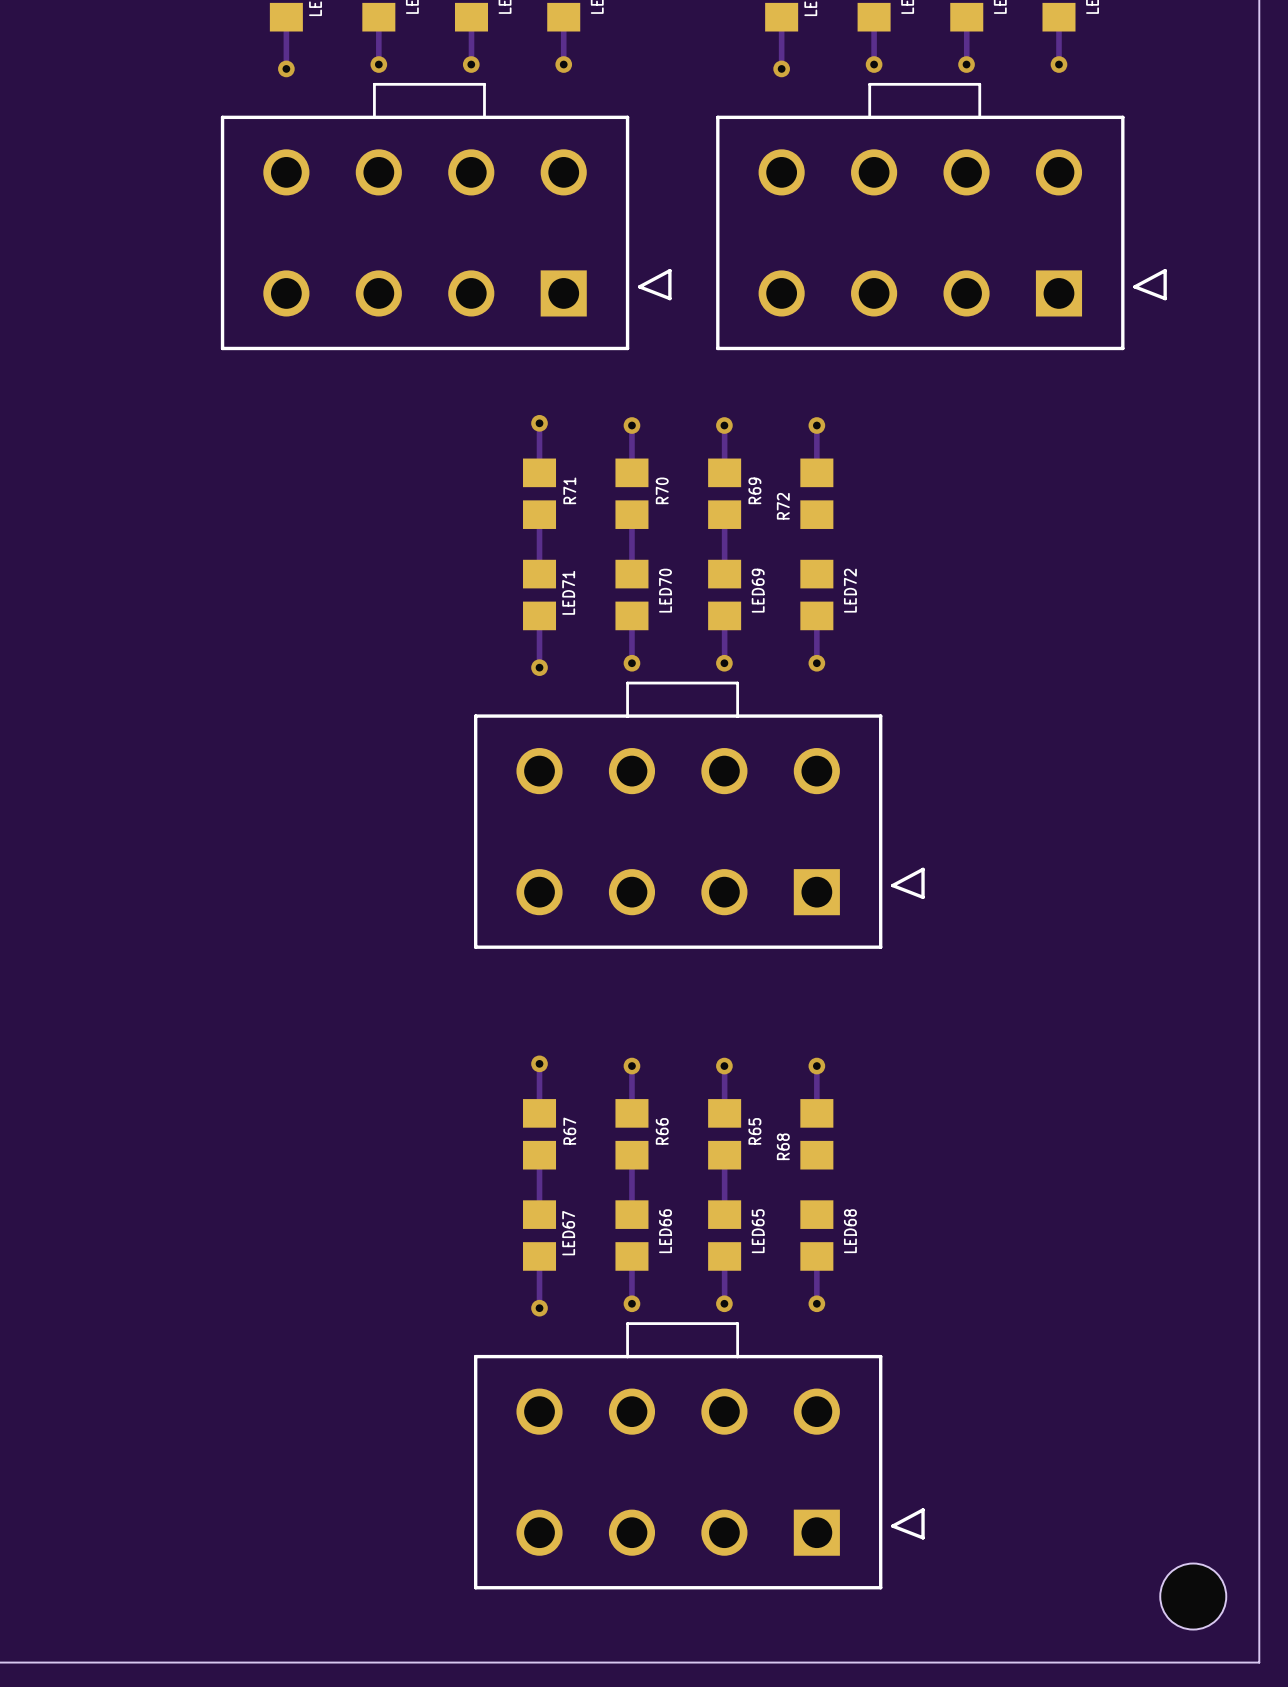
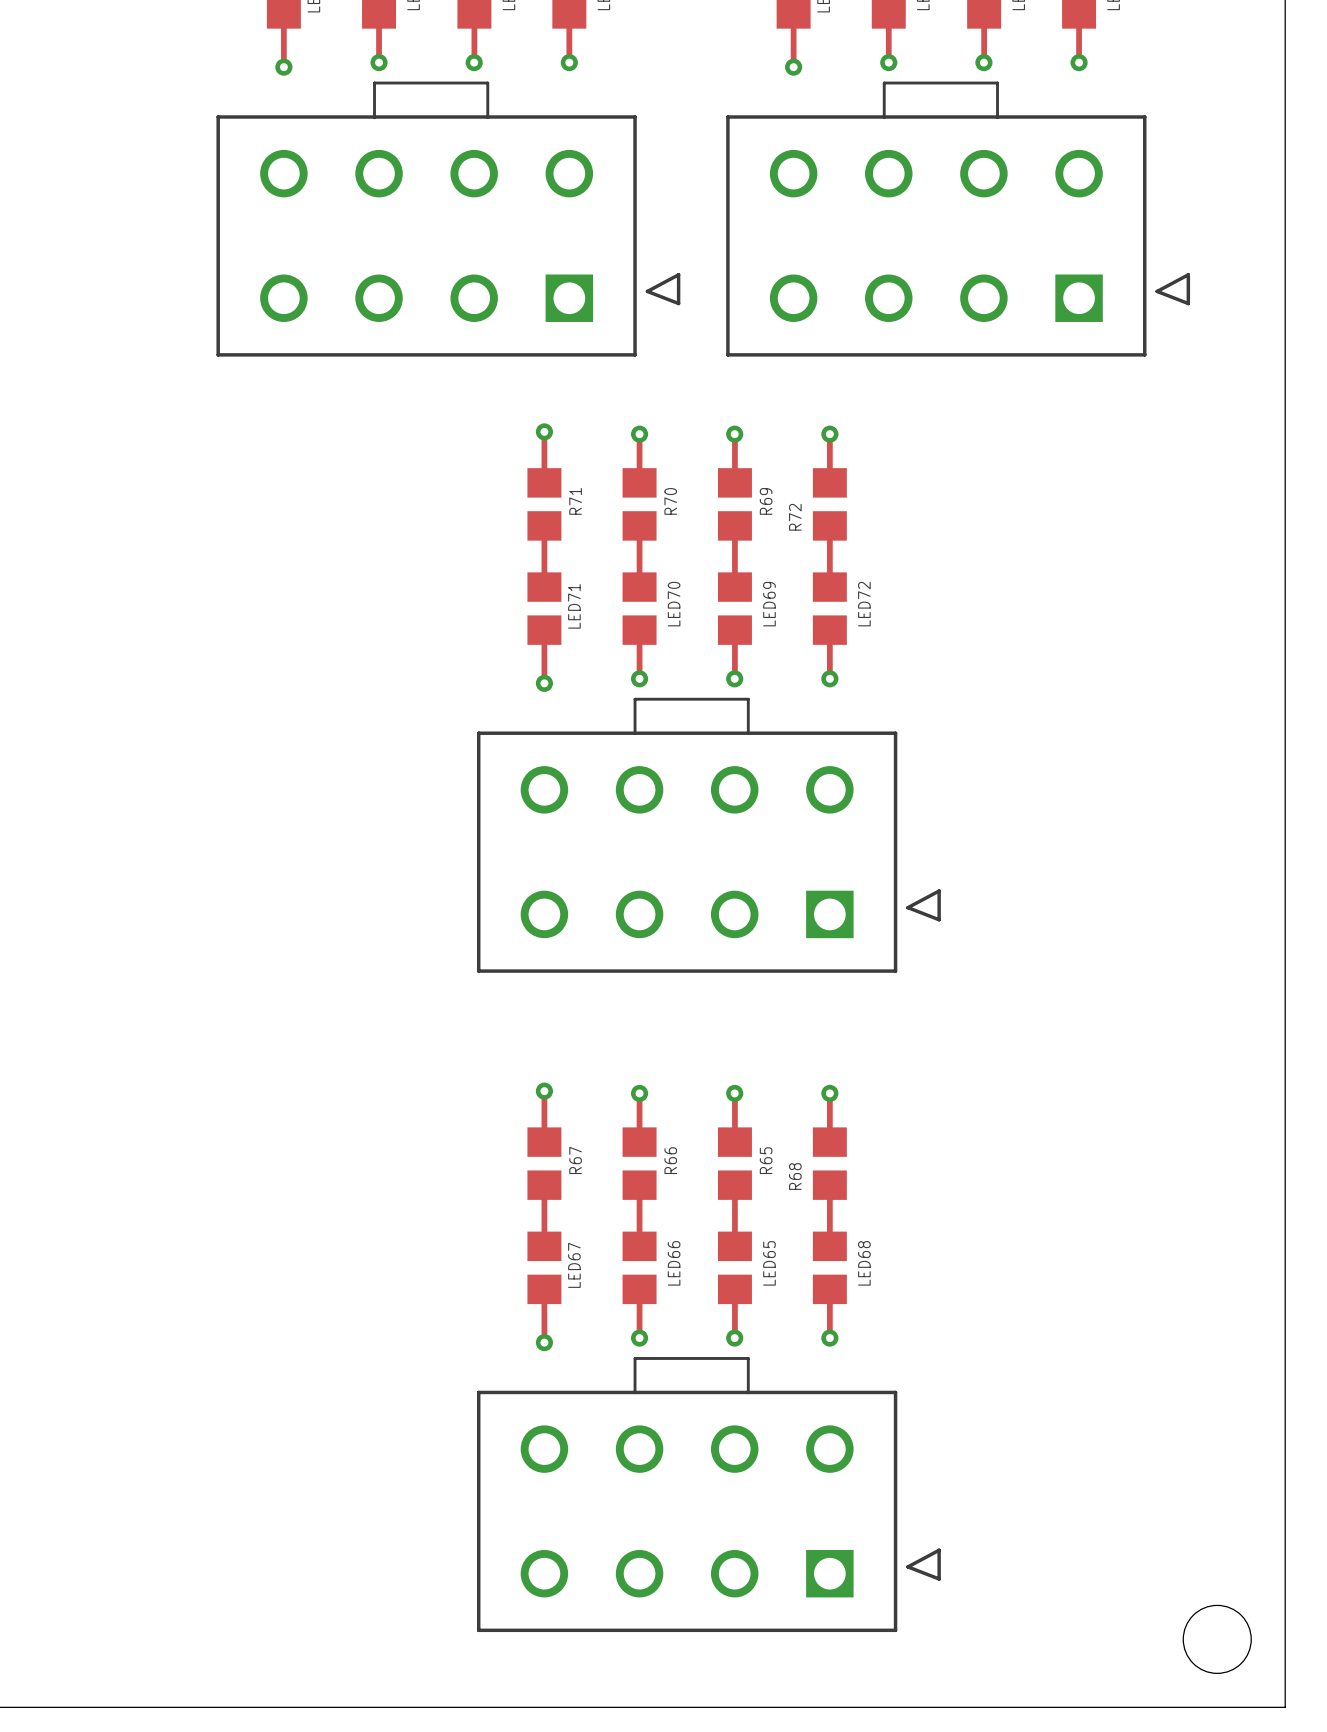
track: none -> (829, 525) (829, 587)
track: none -> (829, 1185) (829, 1246)

